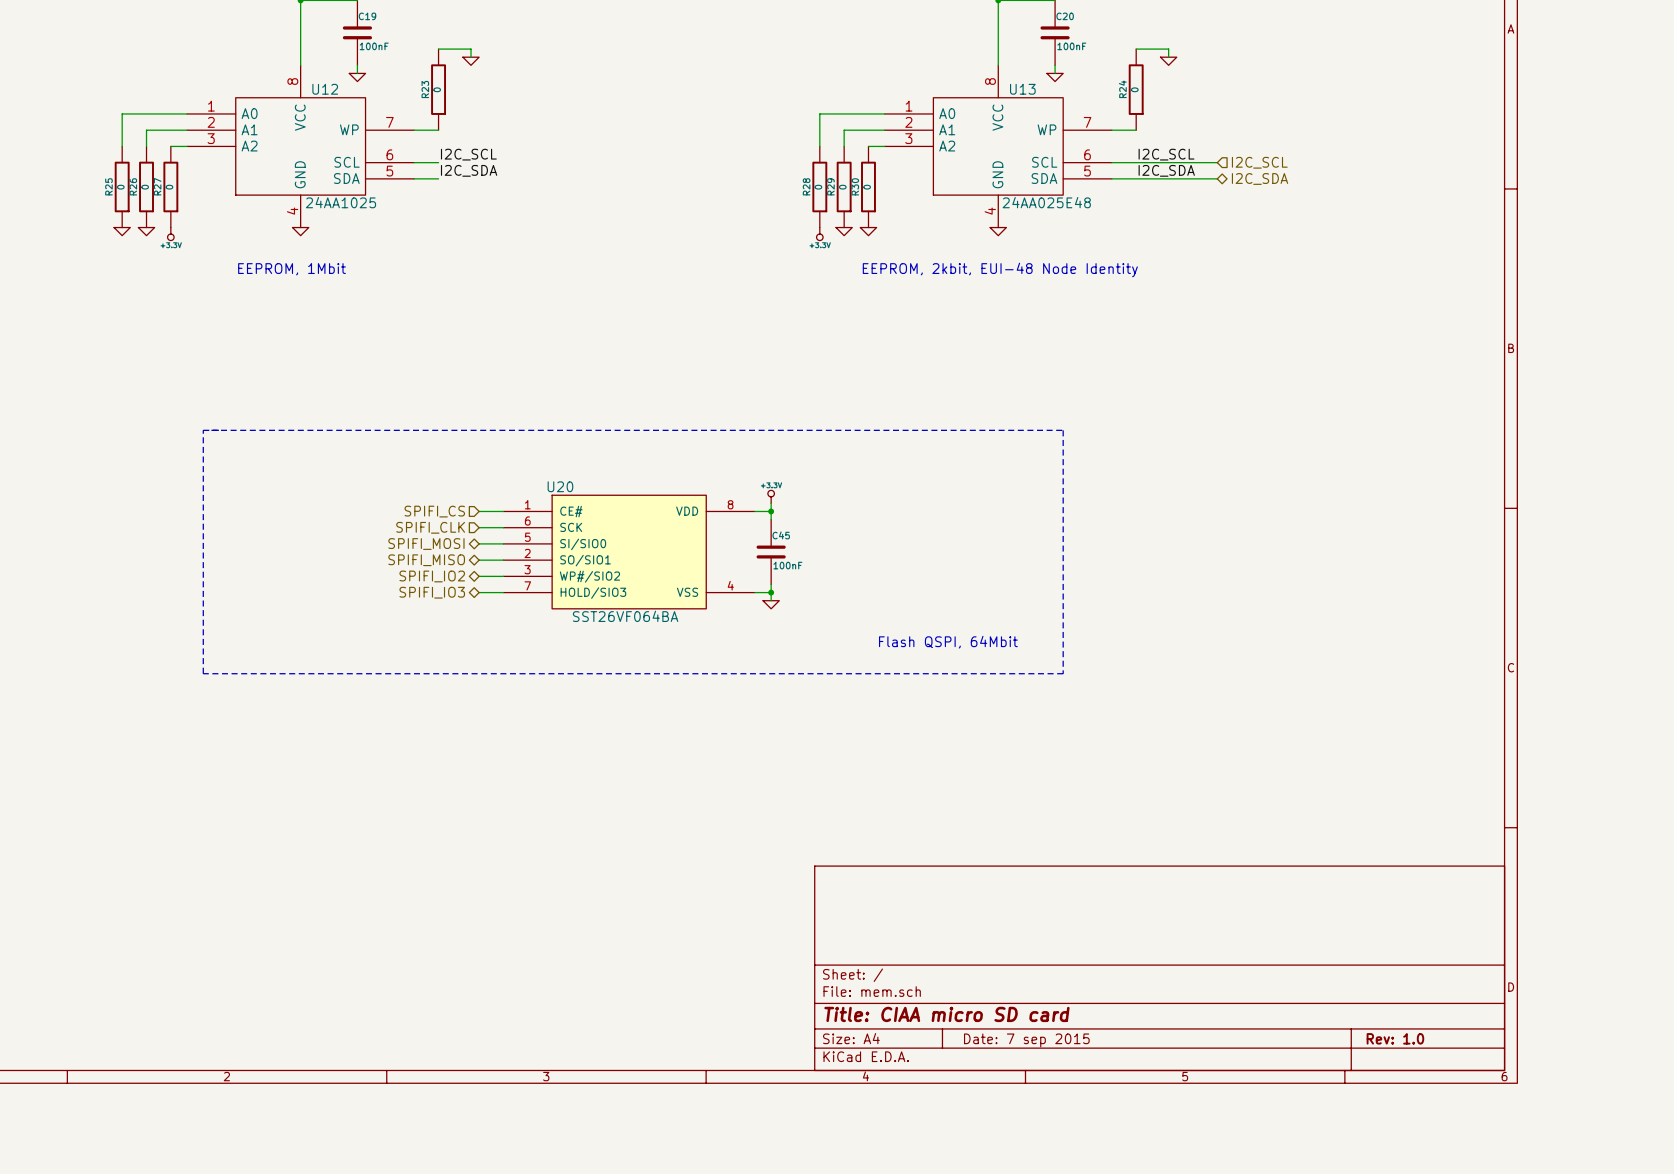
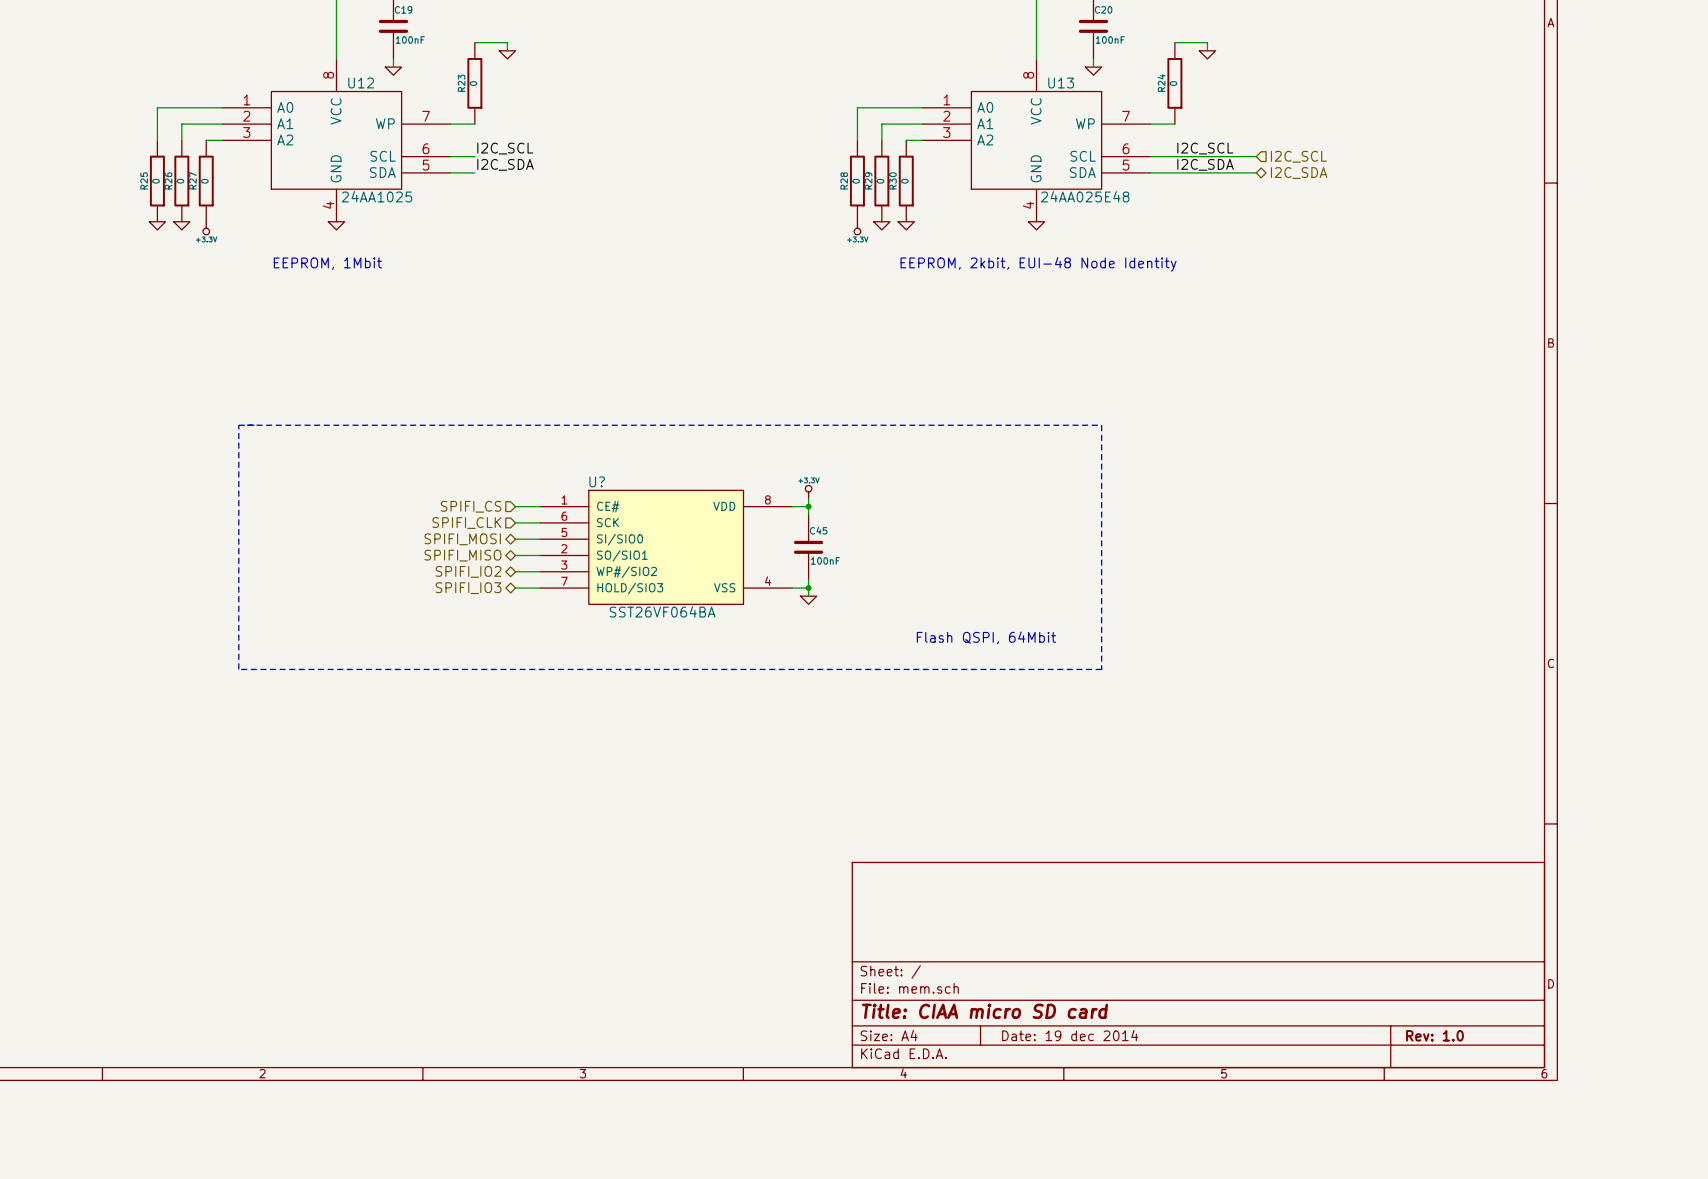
U20 name: U20 (560, 486) -> U? (597, 481)
title block: Date: 7 sep 2015 (1026, 1040) -> Date: 19 dec 2014 (1070, 1035)

